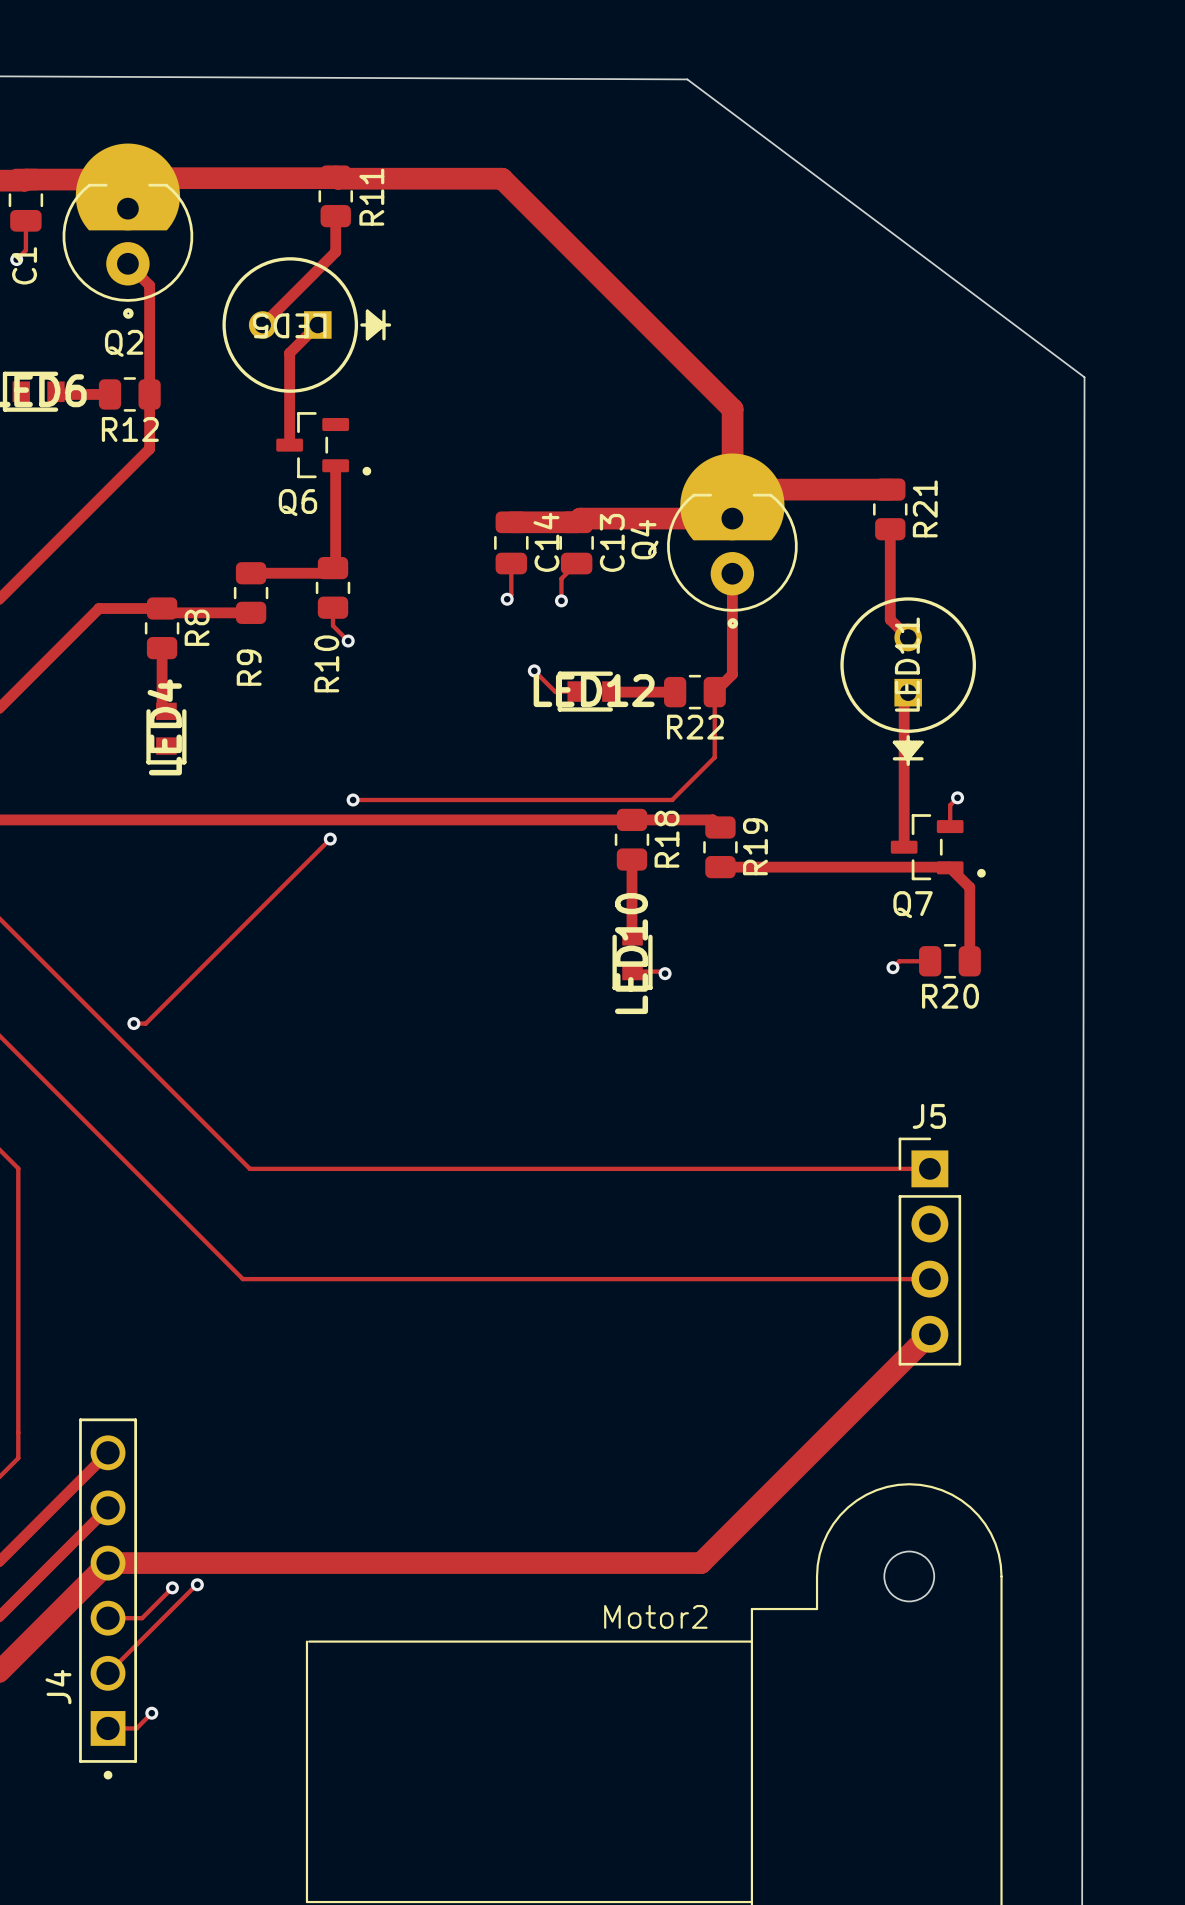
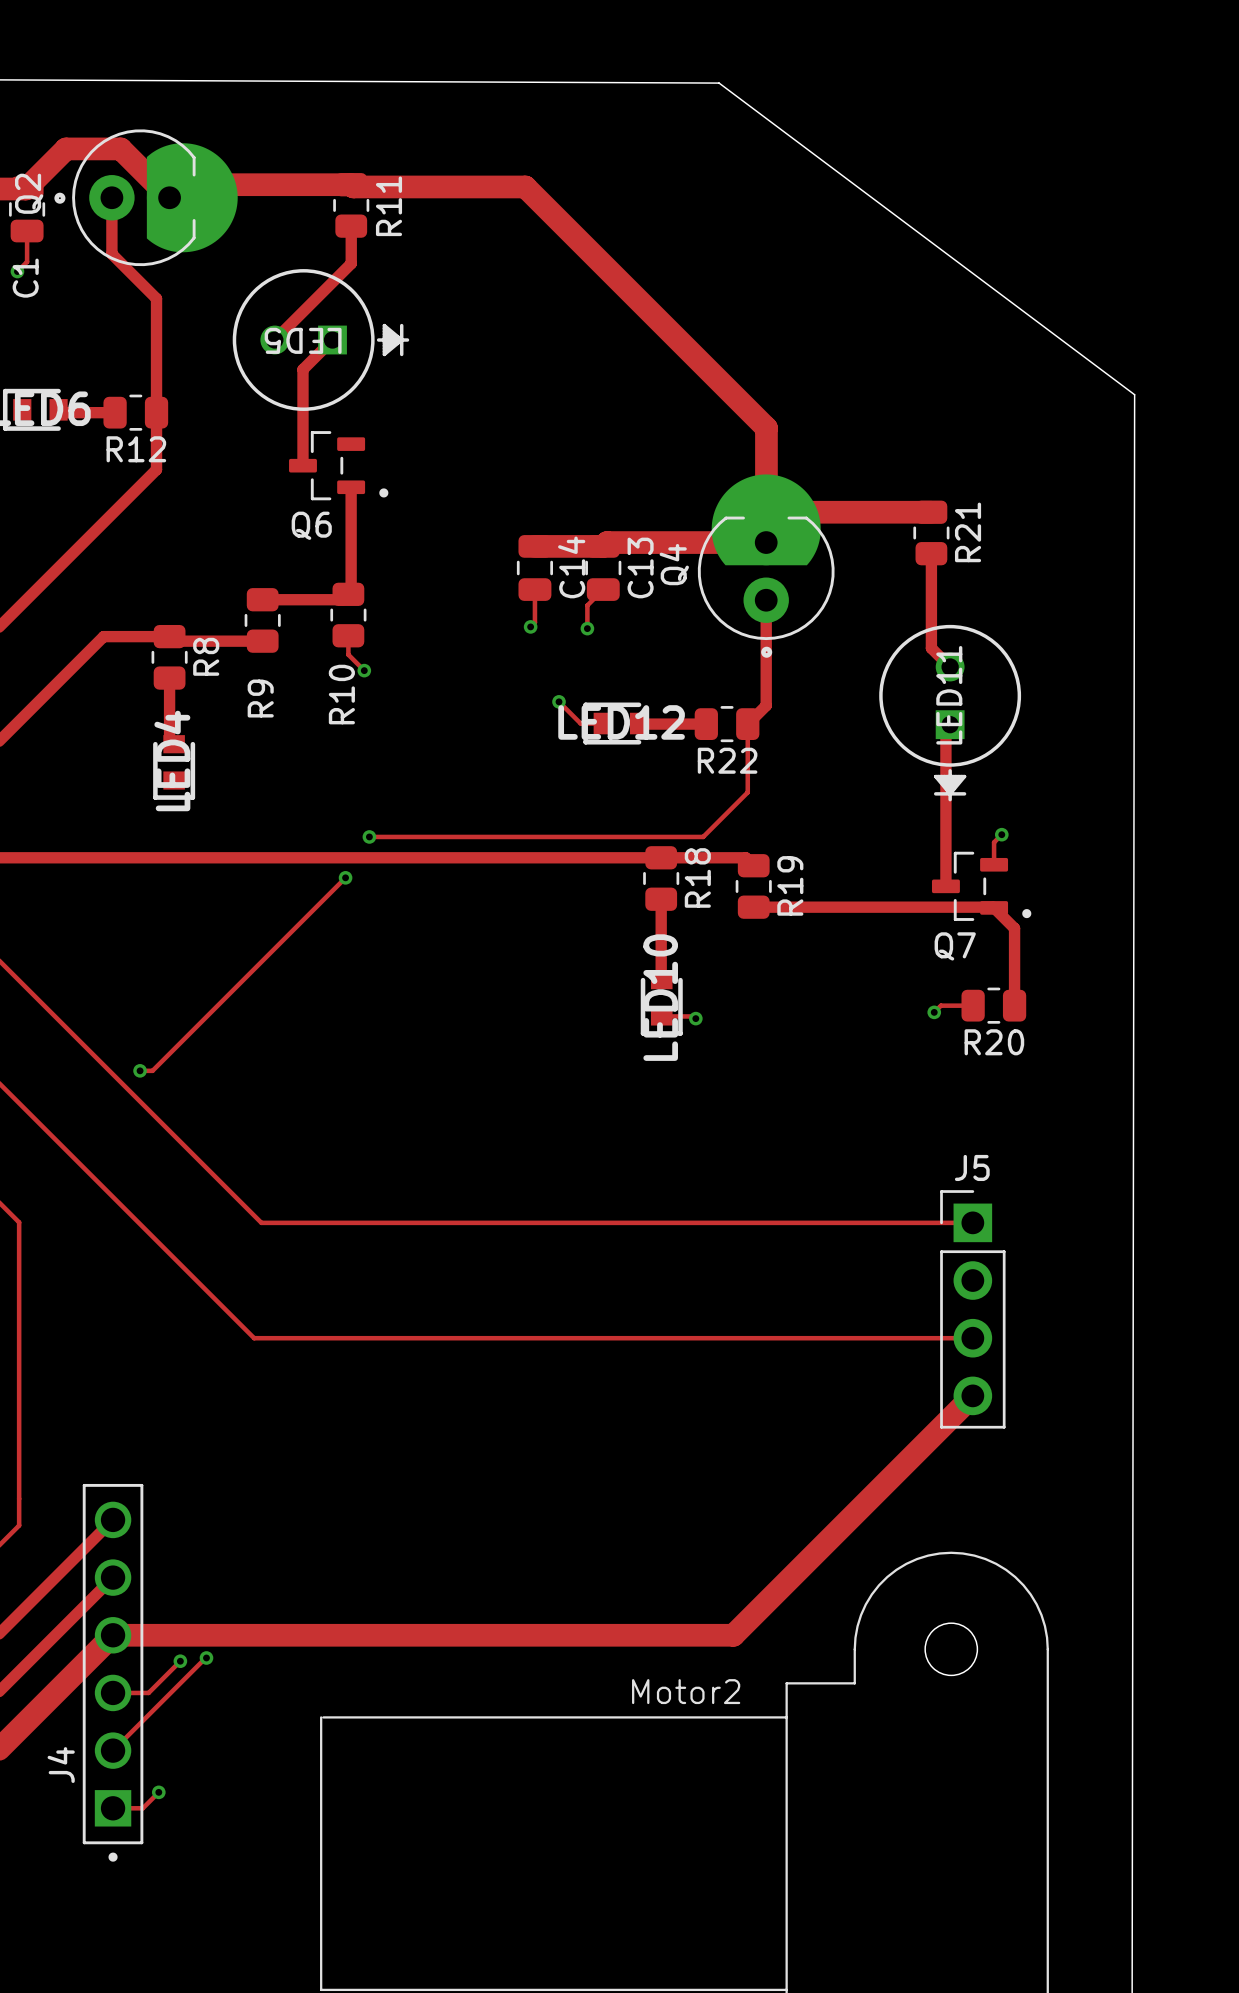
track: (335, 176) (334, 178) (138, 178) (127, 188) (118, 179) (25, 179) -> (351, 184) (182, 184) (169, 197) (120, 148) (66, 148) (27, 187)
track: none -> (111, 197) (111, 254) (133, 275)
Q2 rotation: 0° (127, 231) -> 90° clockwise (146, 197)

